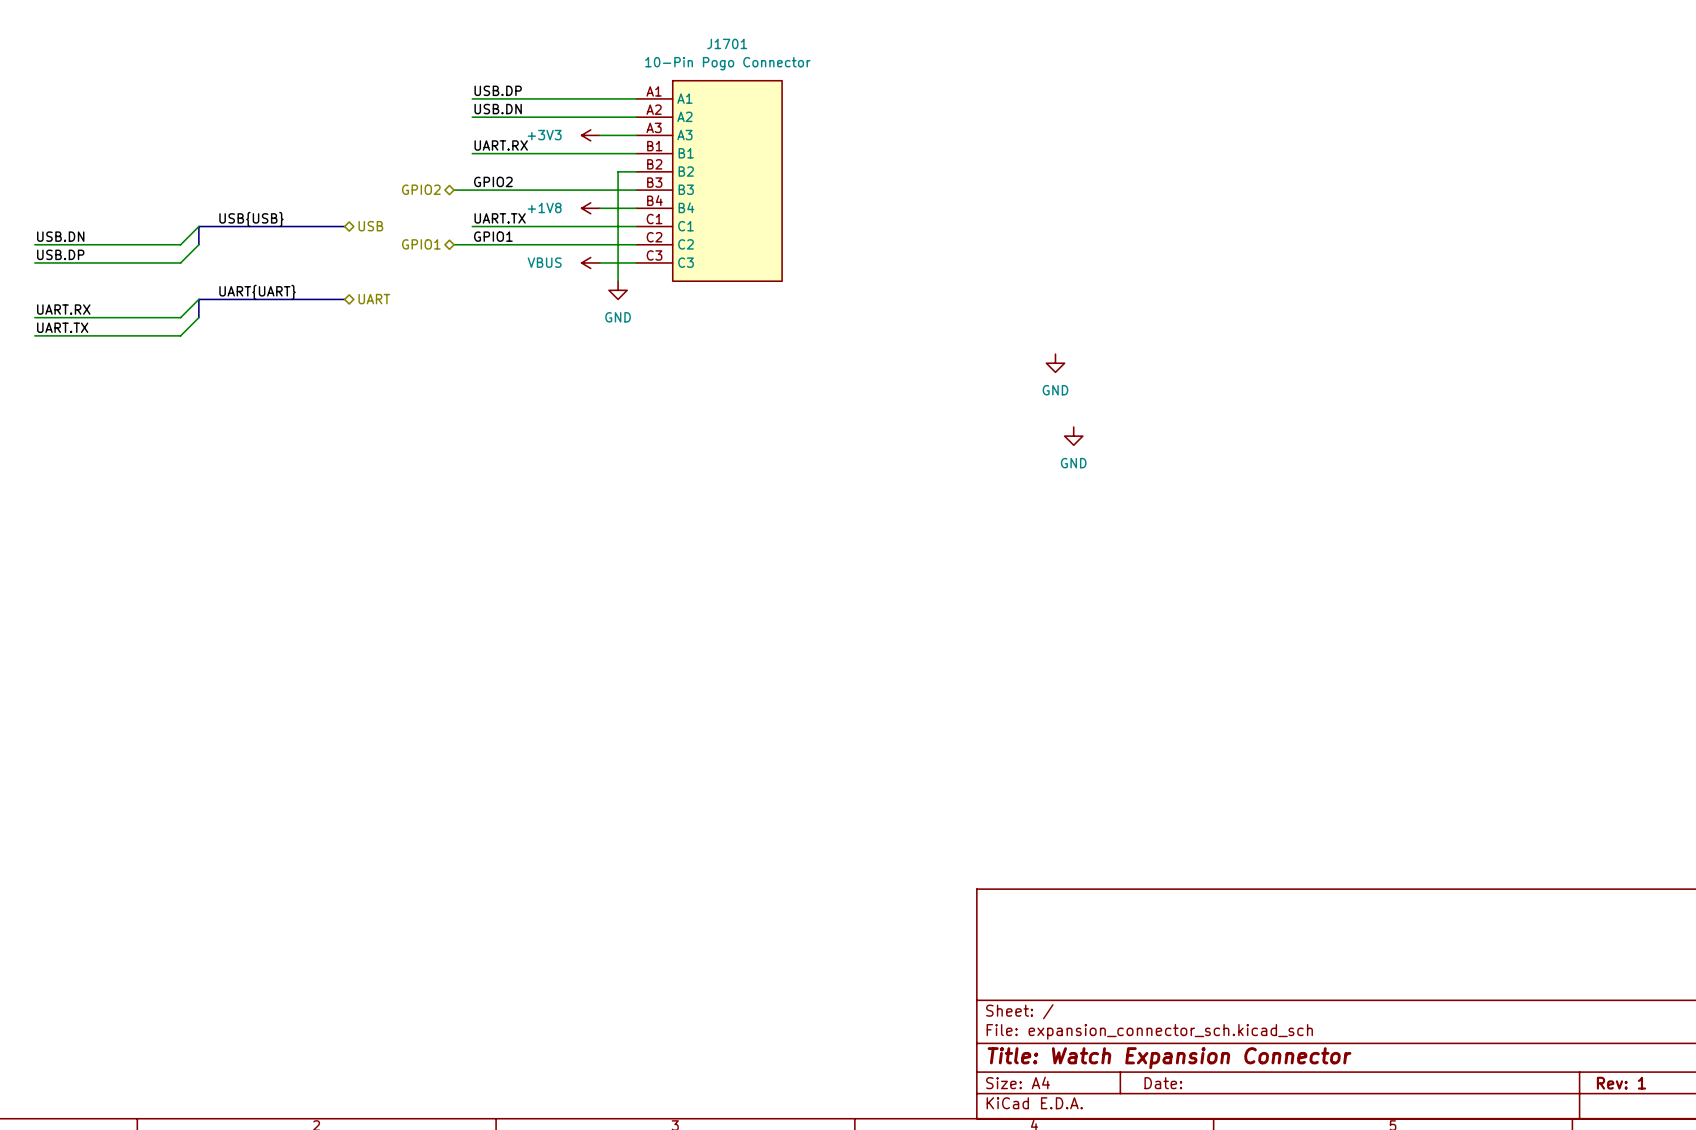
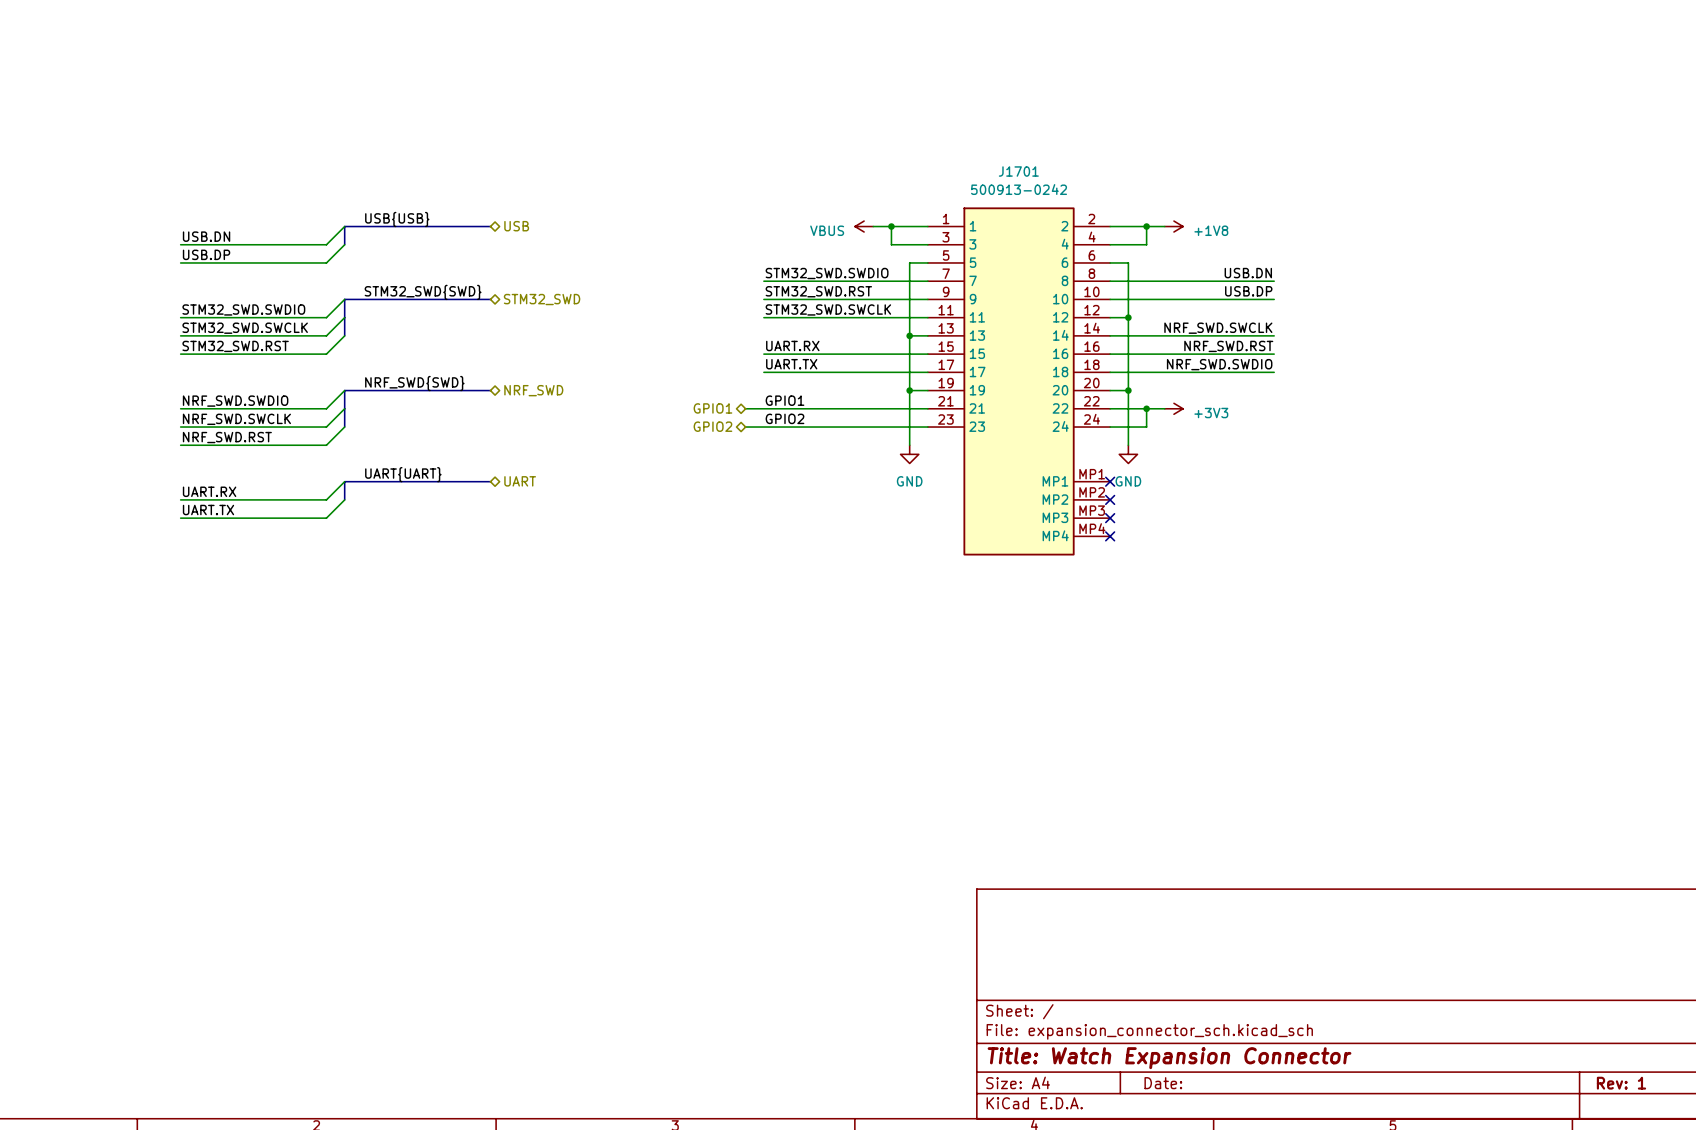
J1701 name position: J1701 (727, 43) -> J1701 (1018, 171)
J1701 value: 10-Pin Pogo Connector (727, 63) -> 500913-0242 (1019, 189)
J1701 symbol: [636, 80, 783, 282] -> [927, 207, 1111, 556]
label: USB.DP (498, 90) -> none
wire: (472, 98) (636, 98) -> none
label: USB.DN (498, 109) -> none
wire: (472, 117) (636, 117) -> none
power symbol: +3V3 (590, 135) -> none
wire: (599, 135) (636, 135) -> none
label: UART.RX (501, 145) -> none
wire: (472, 153) (636, 153) -> none
wire: (636, 171) (618, 171) (618, 281) -> none
label: GPIO2 (493, 181) -> none
hierarchical label: GPIO2 (421, 189) -> none
wire: (454, 190) (636, 190) -> none
power symbol: +1V8 (590, 208) -> none
wire: (599, 208) (636, 208) -> none
label: UART.TX (500, 218) -> none
label position: USB{USB} (251, 219) -> USB{USB} (397, 219)
wire: (198, 226) (180, 244) (34, 244) -> (344, 226) (326, 244) (180, 244)
bus: (344, 226) (198, 226) (198, 244) -> (490, 226) (344, 226) (344, 244)
hierarchical label position: USB (370, 226) -> USB (516, 226)
wire: (472, 226) (636, 226) -> none
power symbol: none -> VBUS (864, 226)
wire: none -> (873, 226) (927, 226)
wire: none -> (891, 226) (891, 244) (927, 244)
junction: none -> (891, 226)
wire: none -> (1110, 226) (1164, 226)
wire: none -> (1146, 226) (1146, 244) (1110, 244)
junction: none -> (1146, 226)
power symbol: none -> +1V8 (1173, 226)
label position: USB.DN (60, 236) -> USB.DN (206, 236)
label: GPIO1 (493, 236) -> none
wire: (198, 244) (180, 262) (34, 262) -> (344, 244) (326, 262) (180, 262)
hierarchical label: GPIO1 (421, 244) -> none
wire: (454, 244) (636, 244) -> none
label position: USB.DP (60, 254) -> USB.DP (206, 254)
power symbol: VBUS (590, 262) -> none
wire: (599, 262) (636, 262) -> none
wire: none -> (927, 262) (909, 262) (909, 445)
wire: none -> (1110, 262) (1128, 262) (1128, 445)
label: none -> STM32_SWD.SWDIO (827, 273)
label: none -> USB.DN (1248, 273)
wire: none -> (763, 281) (927, 281)
wire: none -> (1110, 281) (1274, 281)
power symbol: GND (618, 290) -> none
label: none -> STM32_SWD.RST (818, 291)
label: none -> USB.DP (1248, 291)
label: UART{UART} (257, 292) -> none
label: none -> STM32_SWD{SWD} (423, 292)
wire: (198, 299) (180, 317) (34, 317) -> (344, 299) (326, 317) (180, 317)
bus: (344, 299) (198, 299) (198, 317) -> none
hierarchical label: UART (374, 299) -> none
bus: none -> (490, 299) (344, 299) (344, 335)
hierarchical label: none -> STM32_SWD (542, 299)
wire: none -> (763, 299) (927, 299)
wire: none -> (1110, 299) (1274, 299)
label: UART.RX (63, 309) -> none
label: none -> STM32_SWD.SWDIO (243, 309)
label: none -> STM32_SWD.SWCLK (828, 309)
wire: (198, 317) (180, 335) (34, 335) -> (344, 317) (326, 335) (180, 335)
wire: none -> (763, 317) (927, 317)
wire: none -> (1110, 317) (1128, 317)
junction: none -> (1128, 317)
label: UART.TX (62, 327) -> none
label: none -> STM32_SWD.SWCLK (245, 328)
label: none -> NRF_SWD.SWCLK (1218, 328)
wire: none -> (344, 335) (326, 354) (180, 354)
wire: none -> (909, 335) (927, 335)
junction: none -> (909, 335)
wire: none -> (1110, 335) (1274, 335)
label: none -> UART.RX (792, 345)
label: none -> STM32_SWD.RST (235, 346)
label: none -> NRF_SWD.RST (1228, 346)
wire: none -> (763, 354) (927, 354)
wire: none -> (1110, 354) (1274, 354)
power symbol: GND (1055, 363) -> none
label: none -> UART.TX (791, 364)
label: none -> NRF_SWD.SWDIO (1219, 364)
wire: none -> (763, 372) (927, 372)
wire: none -> (1110, 372) (1274, 372)
label: none -> NRF_SWD{SWD} (414, 383)
wire: none -> (344, 390) (326, 408) (180, 408)
bus: none -> (490, 390) (344, 390) (344, 427)
hierarchical label: none -> NRF_SWD (533, 390)
wire: none -> (909, 390) (927, 390)
junction: none -> (909, 390)
wire: none -> (1110, 390) (1128, 390)
junction: none -> (1128, 390)
label: none -> GPIO1 (784, 400)
label: none -> NRF_SWD.SWDIO (235, 401)
wire: none -> (344, 408) (326, 427) (180, 427)
hierarchical label: none -> GPIO1 (712, 408)
wire: none -> (745, 408) (927, 408)
wire: none -> (1110, 408) (1164, 408)
wire: none -> (1146, 408) (1146, 427) (1110, 427)
junction: none -> (1146, 408)
power symbol: none -> +3V3 (1173, 408)
label: none -> GPIO2 (784, 418)
label: none -> NRF_SWD.SWCLK (236, 419)
hierarchical label: none -> GPIO2 (712, 426)
wire: none -> (344, 427) (326, 445) (180, 445)
wire: none -> (745, 427) (927, 427)
power symbol position: GND (1073, 436) -> GND (1128, 454)
label: none -> NRF_SWD.RST (227, 437)
power symbol: none -> GND (909, 454)
label: none -> UART{UART} (403, 474)
wire: none -> (344, 481) (326, 499) (180, 499)
bus: none -> (490, 481) (344, 481) (344, 499)
hierarchical label: none -> UART (520, 481)
no-connect mark: none -> (1110, 481)
label: none -> UART.RX (209, 491)
wire: none -> (344, 499) (326, 518) (180, 518)
no-connect mark: none -> (1110, 499)
label: none -> UART.TX (208, 510)
no-connect mark: none -> (1110, 518)
no-connect mark: none -> (1110, 536)

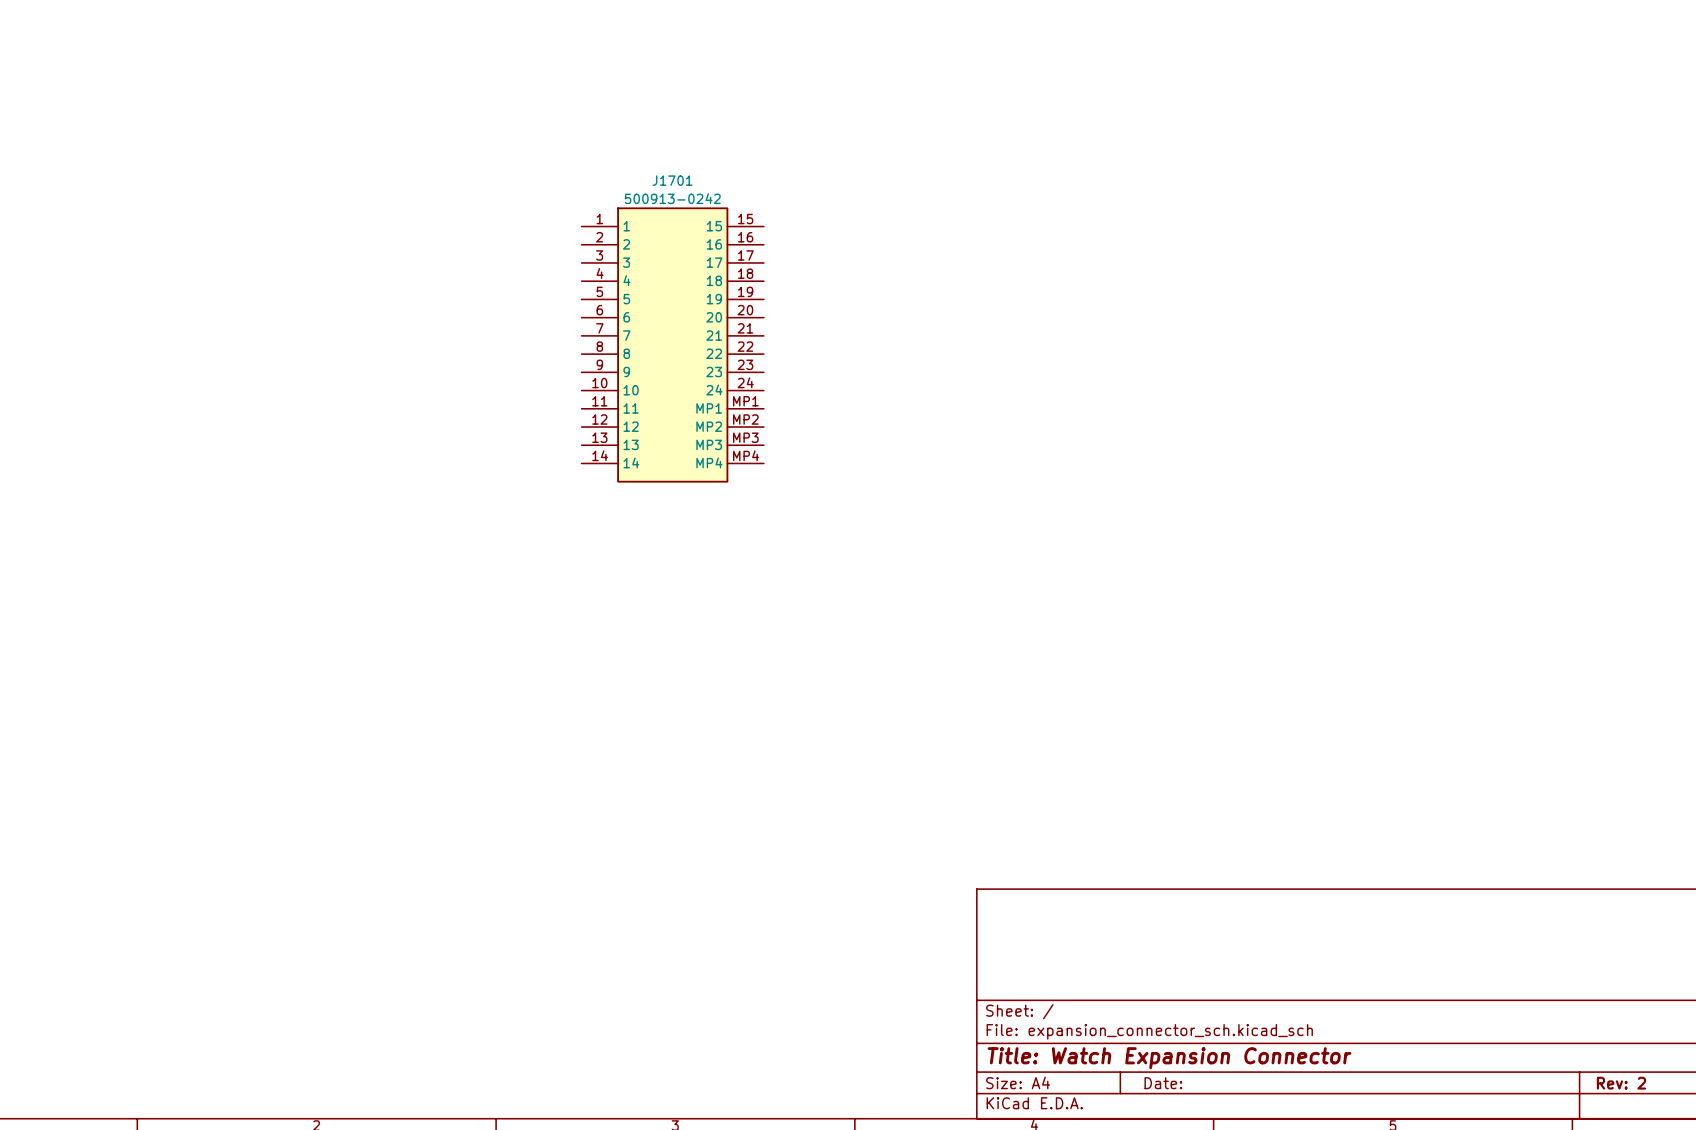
J1701 name position: J1701 (1018, 171) -> J1701 (672, 180)
J1701 value position: 500913-0242 (1019, 189) -> 500913-0242 (672, 198)
J1701 symbol: [927, 207, 1111, 556] -> [581, 207, 764, 483]
label: USB{USB} (397, 219) -> none
wire: (344, 226) (326, 244) (180, 244) -> none
bus: (490, 226) (344, 226) (344, 244) -> none
hierarchical label: USB (516, 226) -> none
power symbol: VBUS (864, 226) -> none
wire: (873, 226) (927, 226) -> none
wire: (891, 226) (891, 244) (927, 244) -> none
junction: (891, 226) -> none
wire: (1110, 226) (1164, 226) -> none
wire: (1146, 226) (1146, 244) (1110, 244) -> none
junction: (1146, 226) -> none
power symbol: +1V8 (1173, 226) -> none
label: USB.DN (206, 236) -> none
wire: (344, 244) (326, 262) (180, 262) -> none
label: USB.DP (206, 254) -> none
wire: (927, 262) (909, 262) (909, 445) -> none
wire: (1110, 262) (1128, 262) (1128, 445) -> none
label: STM32_SWD.SWDIO (827, 273) -> none
label: USB.DN (1248, 273) -> none
wire: (763, 281) (927, 281) -> none
wire: (1110, 281) (1274, 281) -> none
label: STM32_SWD.RST (818, 291) -> none
label: USB.DP (1248, 291) -> none
label: STM32_SWD{SWD} (423, 292) -> none
wire: (344, 299) (326, 317) (180, 317) -> none
bus: (490, 299) (344, 299) (344, 335) -> none
hierarchical label: STM32_SWD (542, 299) -> none
wire: (763, 299) (927, 299) -> none
wire: (1110, 299) (1274, 299) -> none
label: STM32_SWD.SWDIO (243, 309) -> none
label: STM32_SWD.SWCLK (828, 309) -> none
wire: (344, 317) (326, 335) (180, 335) -> none
wire: (763, 317) (927, 317) -> none
wire: (1110, 317) (1128, 317) -> none
junction: (1128, 317) -> none
label: STM32_SWD.SWCLK (245, 328) -> none
label: NRF_SWD.SWCLK (1218, 328) -> none
wire: (344, 335) (326, 354) (180, 354) -> none
wire: (909, 335) (927, 335) -> none
junction: (909, 335) -> none
wire: (1110, 335) (1274, 335) -> none
label: UART.RX (792, 345) -> none
label: STM32_SWD.RST (235, 346) -> none
label: NRF_SWD.RST (1228, 346) -> none
wire: (763, 354) (927, 354) -> none
wire: (1110, 354) (1274, 354) -> none
label: UART.TX (791, 364) -> none
label: NRF_SWD.SWDIO (1219, 364) -> none
wire: (763, 372) (927, 372) -> none
wire: (1110, 372) (1274, 372) -> none
label: NRF_SWD{SWD} (414, 383) -> none
wire: (344, 390) (326, 408) (180, 408) -> none
bus: (490, 390) (344, 390) (344, 427) -> none
hierarchical label: NRF_SWD (533, 390) -> none
wire: (909, 390) (927, 390) -> none
junction: (909, 390) -> none
wire: (1110, 390) (1128, 390) -> none
junction: (1128, 390) -> none
label: GPIO1 (784, 400) -> none
label: NRF_SWD.SWDIO (235, 401) -> none
wire: (344, 408) (326, 427) (180, 427) -> none
hierarchical label: GPIO1 (712, 408) -> none
wire: (745, 408) (927, 408) -> none
wire: (1110, 408) (1164, 408) -> none
wire: (1146, 408) (1146, 427) (1110, 427) -> none
junction: (1146, 408) -> none
power symbol: +3V3 (1173, 408) -> none
label: GPIO2 (784, 418) -> none
label: NRF_SWD.SWCLK (236, 419) -> none
hierarchical label: GPIO2 (712, 426) -> none
wire: (344, 427) (326, 445) (180, 445) -> none
wire: (745, 427) (927, 427) -> none
label: NRF_SWD.RST (227, 437) -> none
power symbol: GND (909, 454) -> none
power symbol: GND (1128, 454) -> none
label: UART{UART} (403, 474) -> none
wire: (344, 481) (326, 499) (180, 499) -> none
bus: (490, 481) (344, 481) (344, 499) -> none
hierarchical label: UART (520, 481) -> none
no-connect mark: (1110, 481) -> none
label: UART.RX (209, 491) -> none
wire: (344, 499) (326, 518) (180, 518) -> none
no-connect mark: (1110, 499) -> none
label: UART.TX (208, 510) -> none
no-connect mark: (1110, 518) -> none
no-connect mark: (1110, 536) -> none
title block: Rev: 1 (1621, 1083) -> Rev: 2 (1621, 1083)

